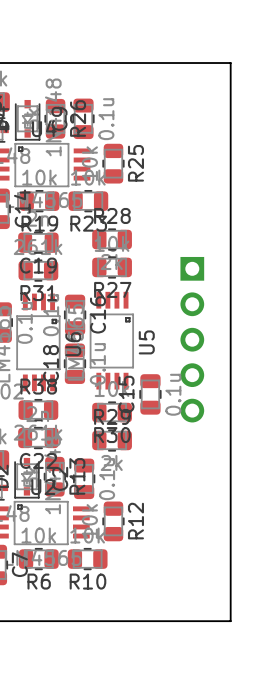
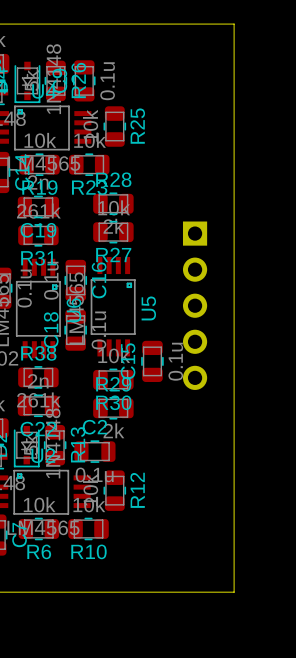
C2 rotation: 0° (84, 478) -> 90° clockwise (94, 451)

